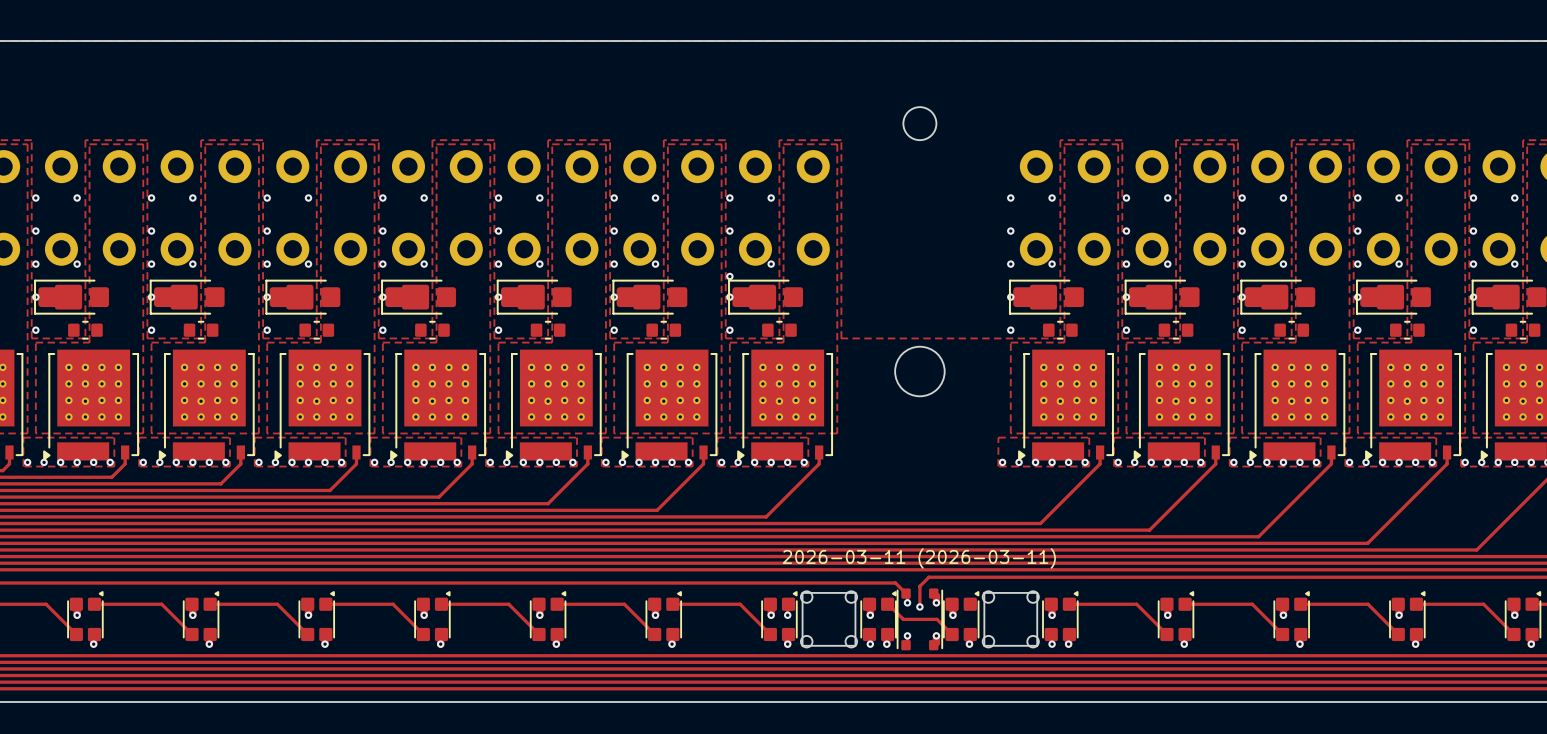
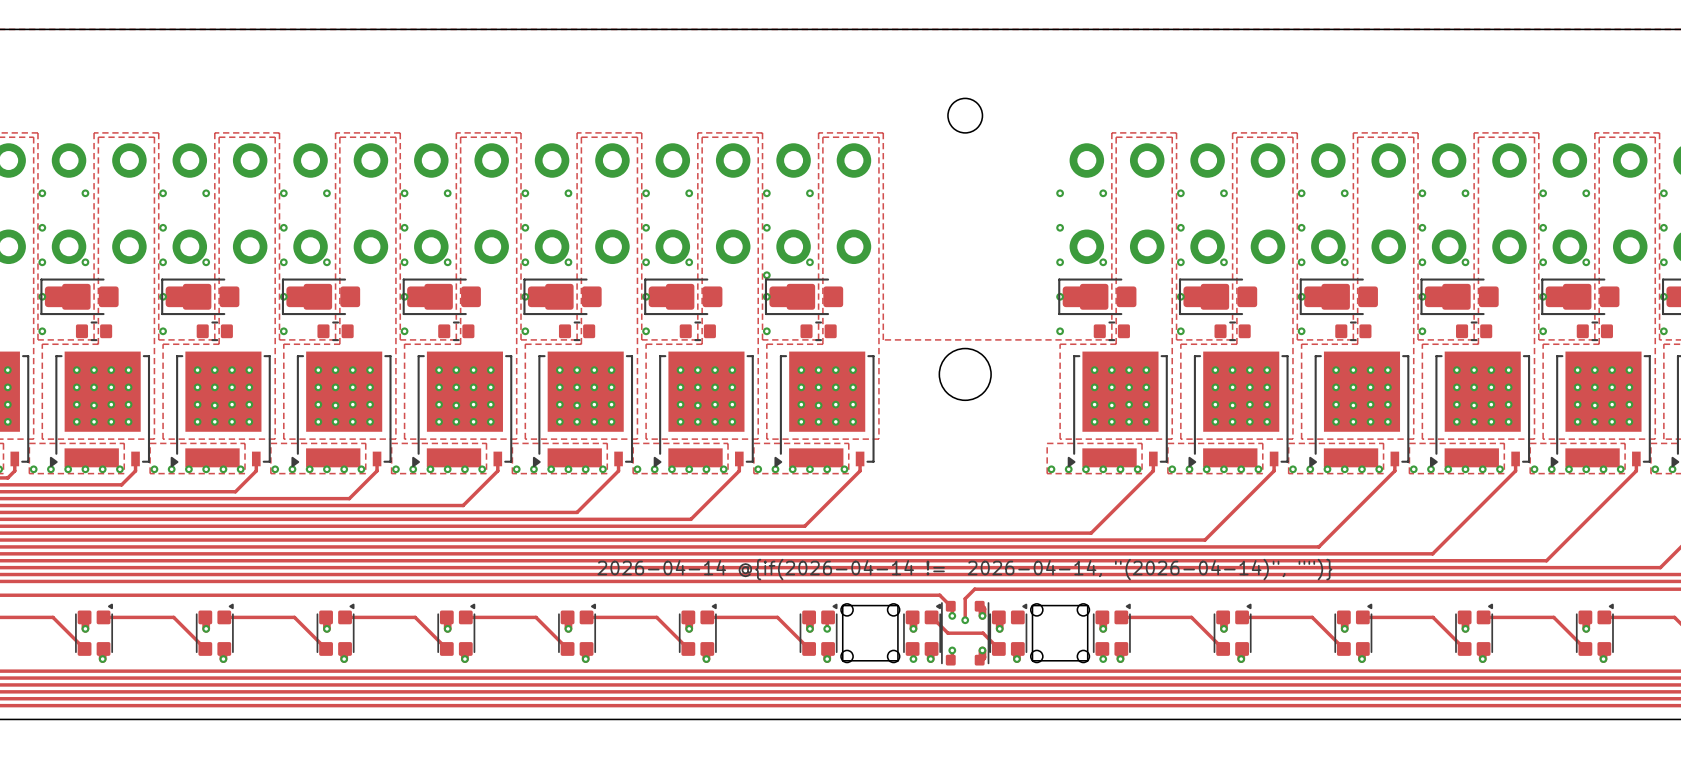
drawing shape: [782, 548, 1056, 569] -> [597, 558, 1333, 581]

